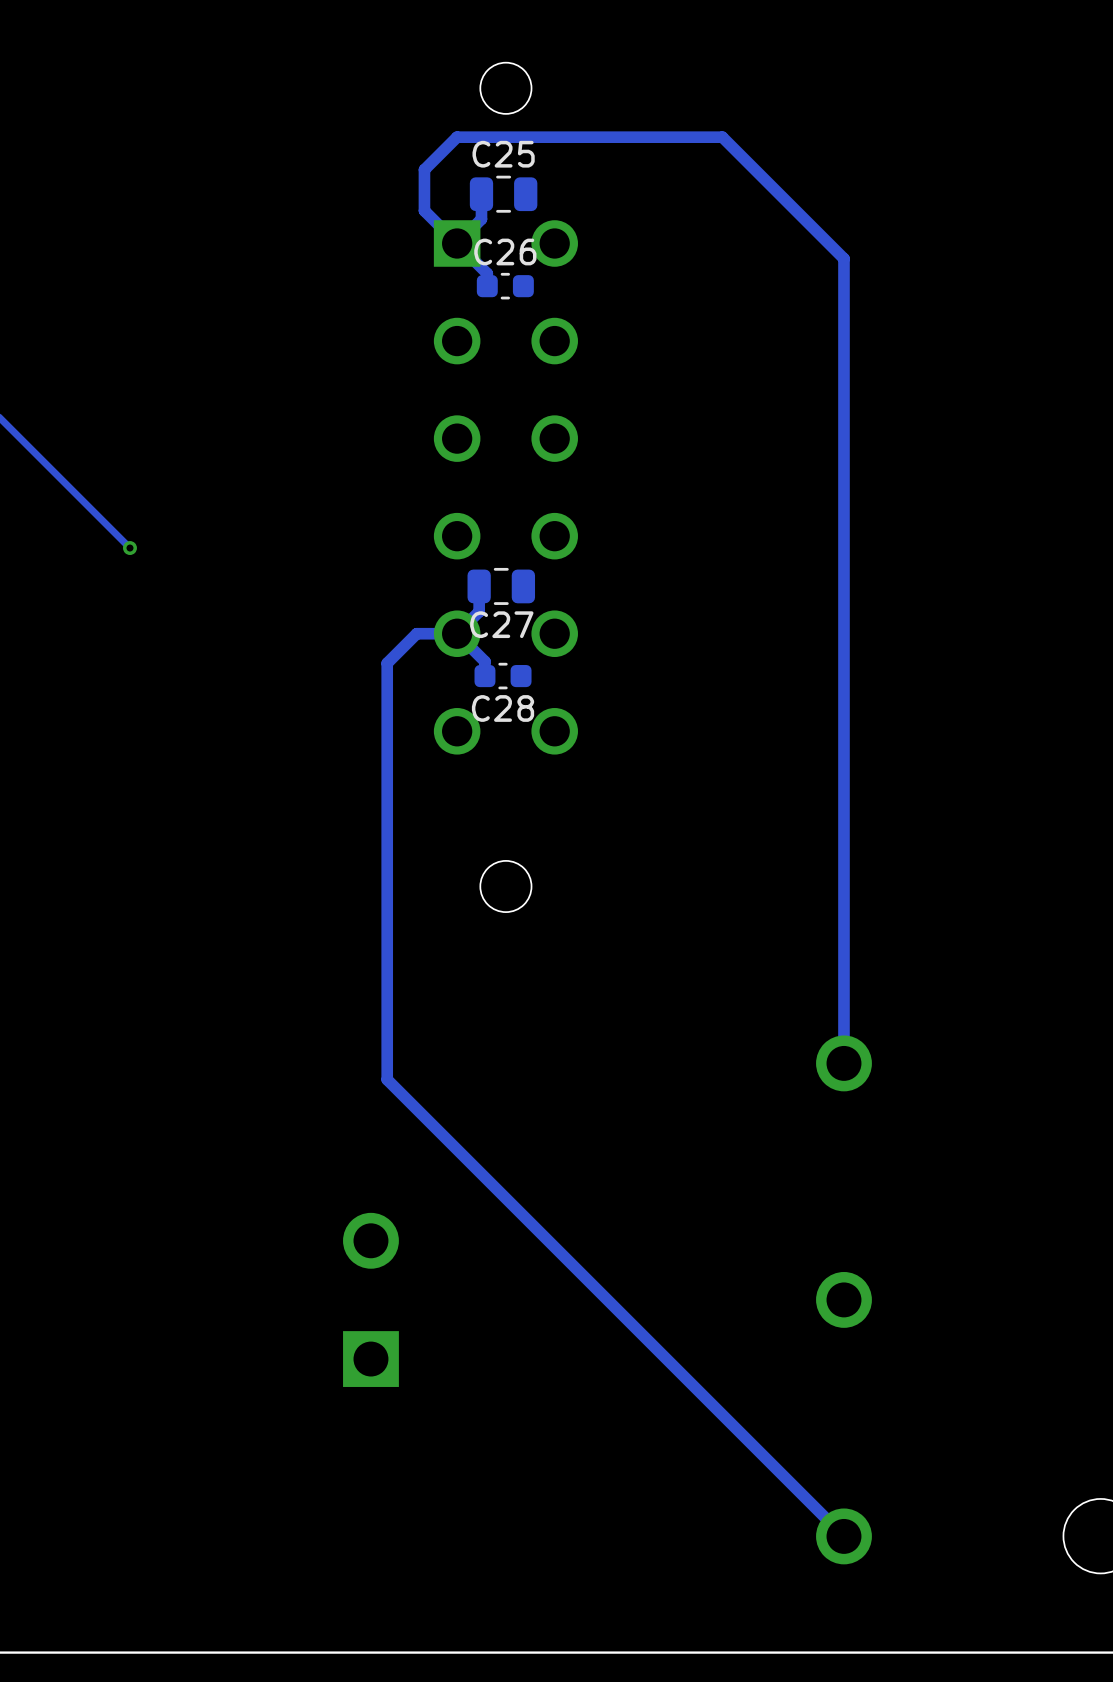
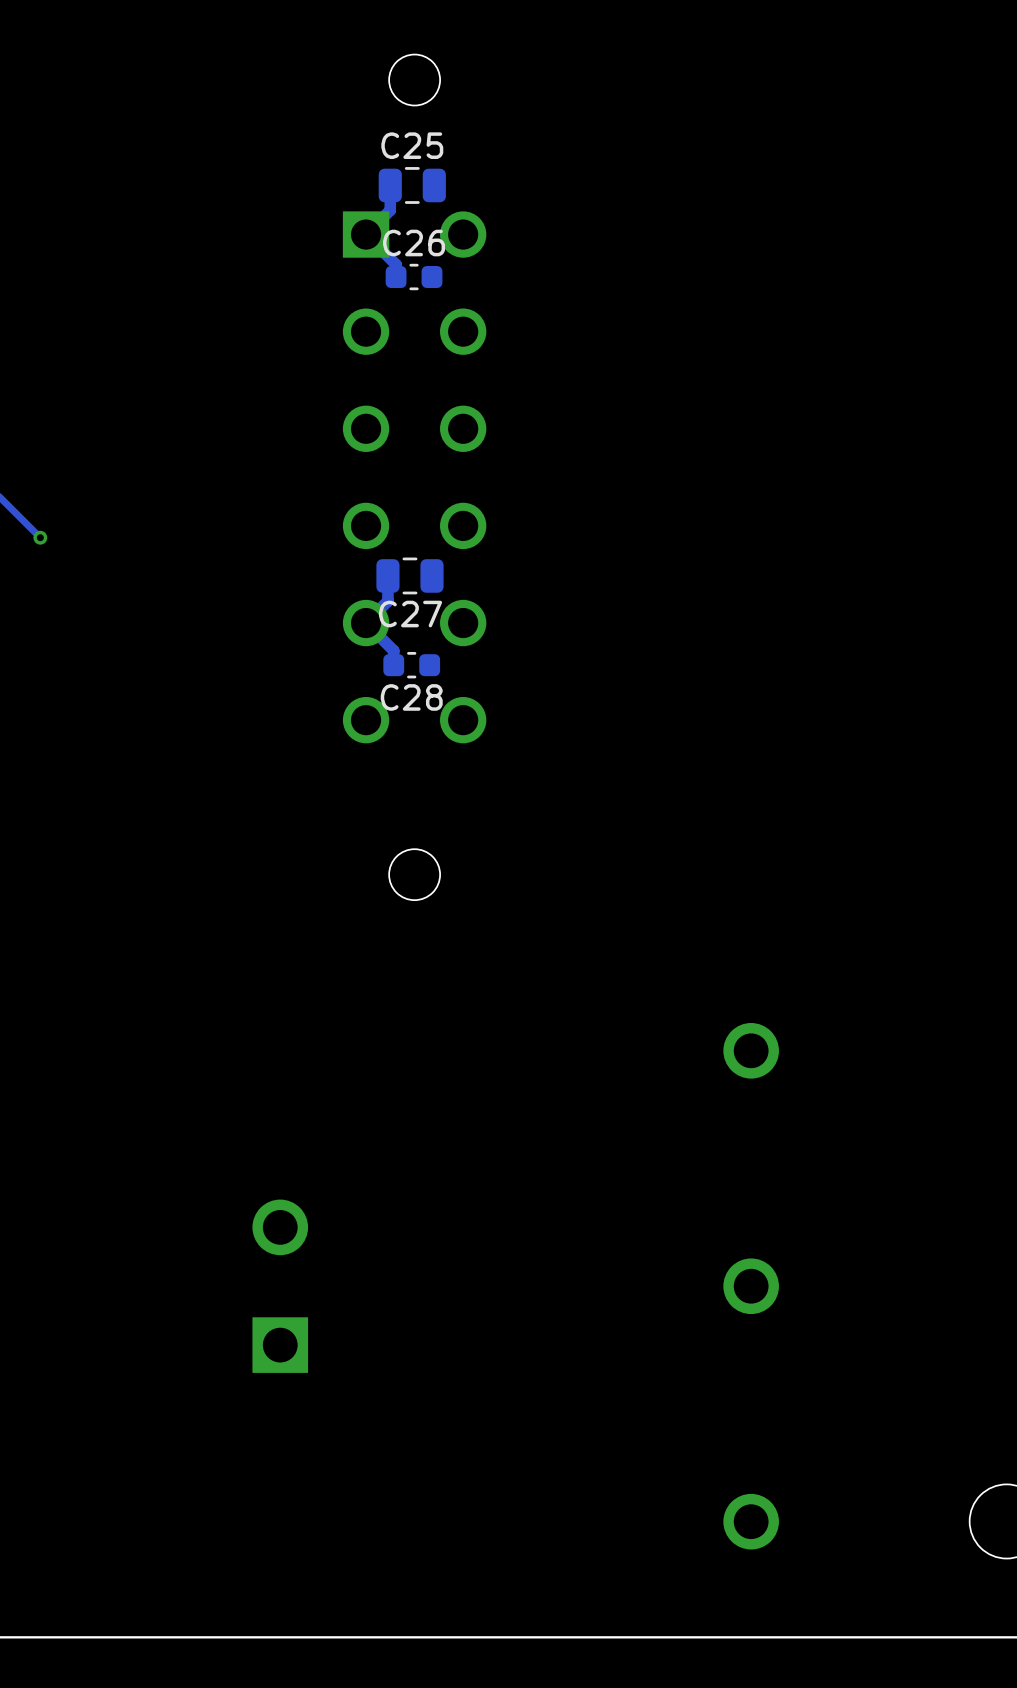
track: (457, 243) (424, 210) (424, 169) (457, 137) (722, 137) (843, 258) (843, 1063) -> none
track: (457, 633) (416, 633) (387, 663) (387, 1079) (843, 1536) -> none

